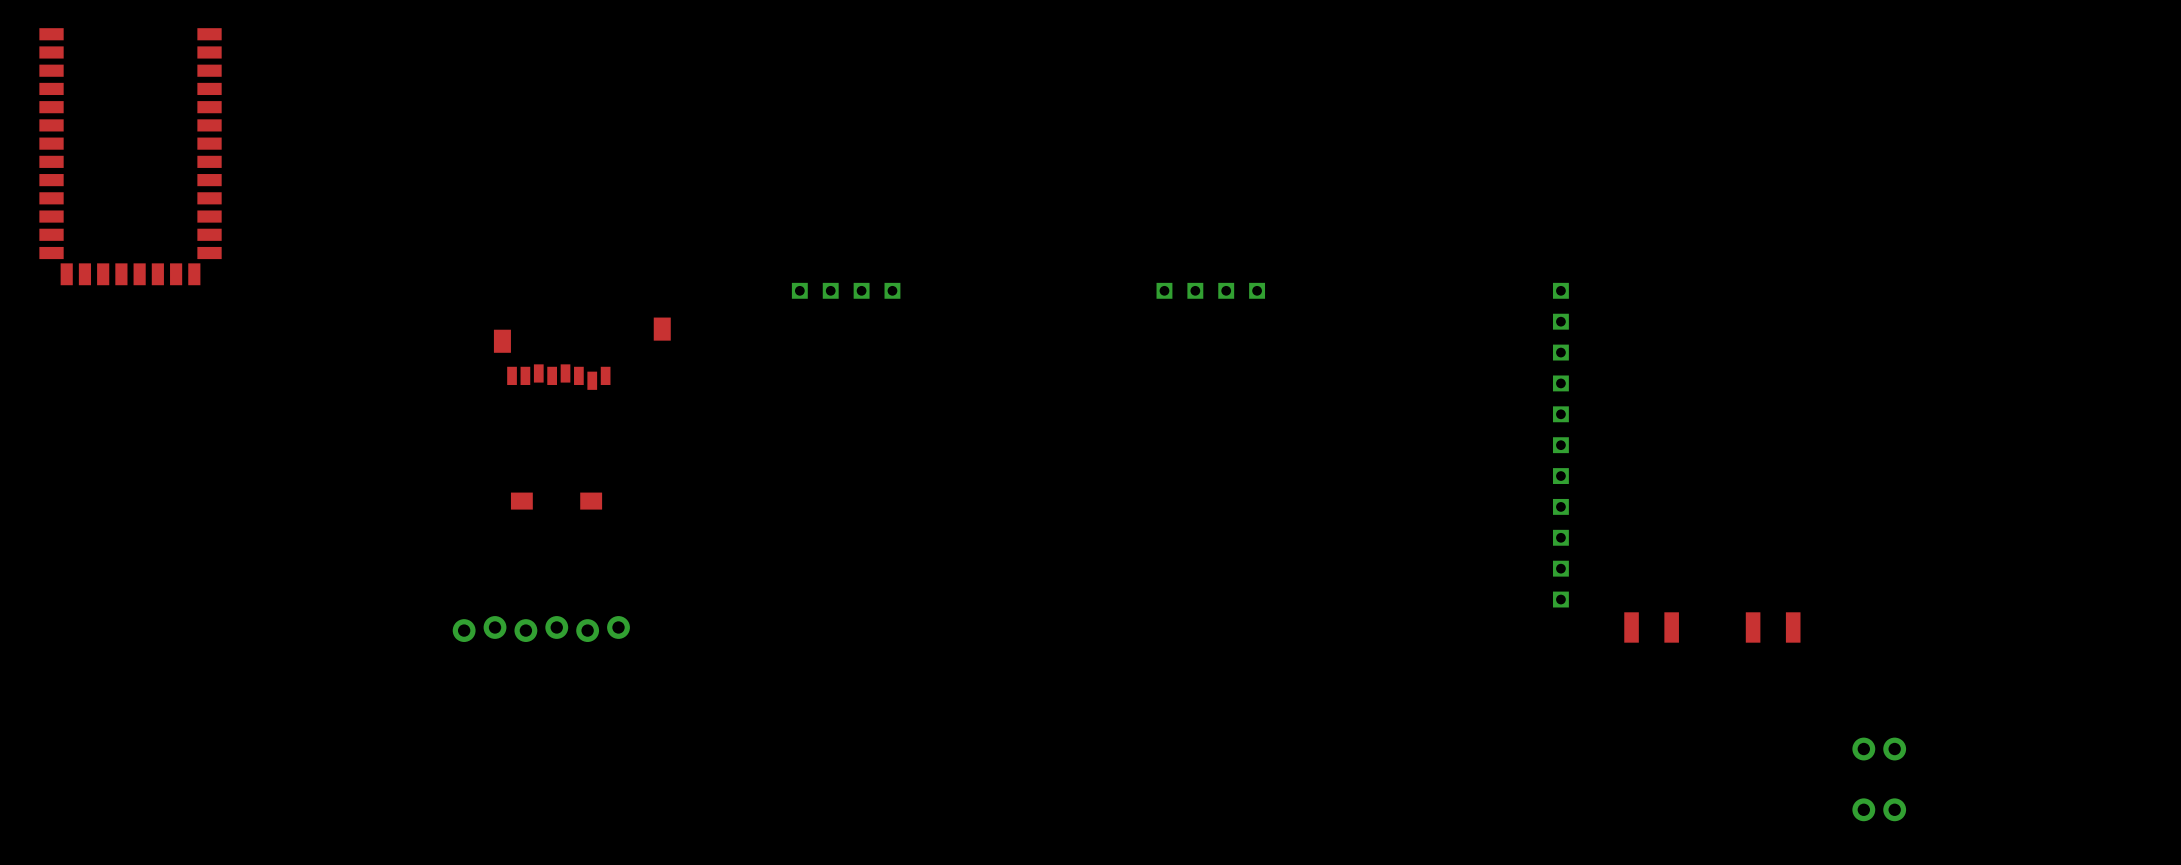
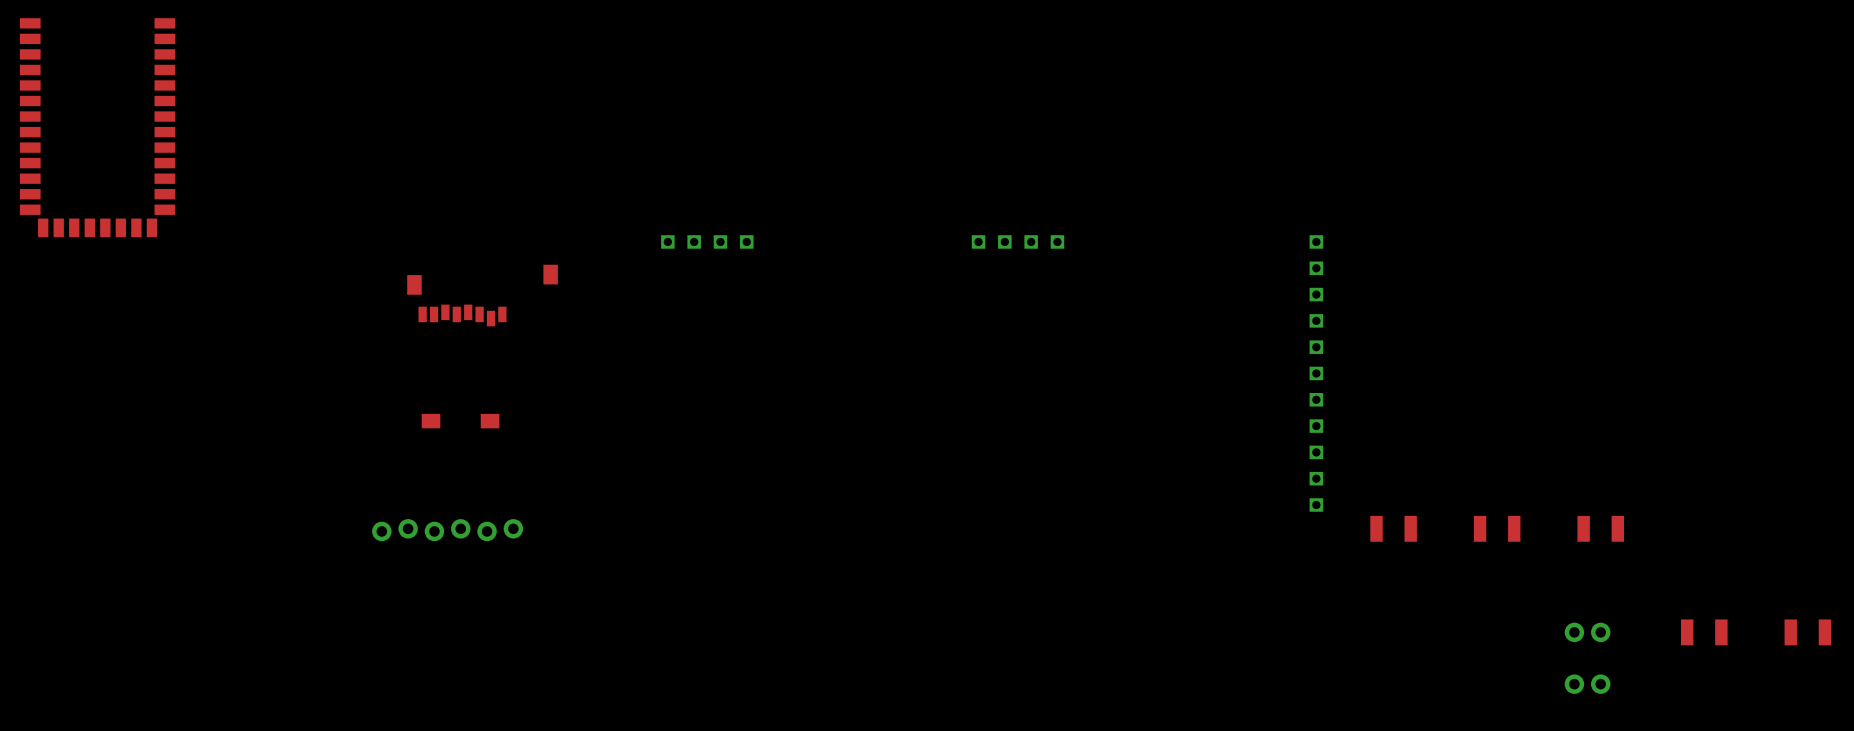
part: none -> (1600, 528)
part: none -> (1704, 632)
part: none -> (1807, 632)

